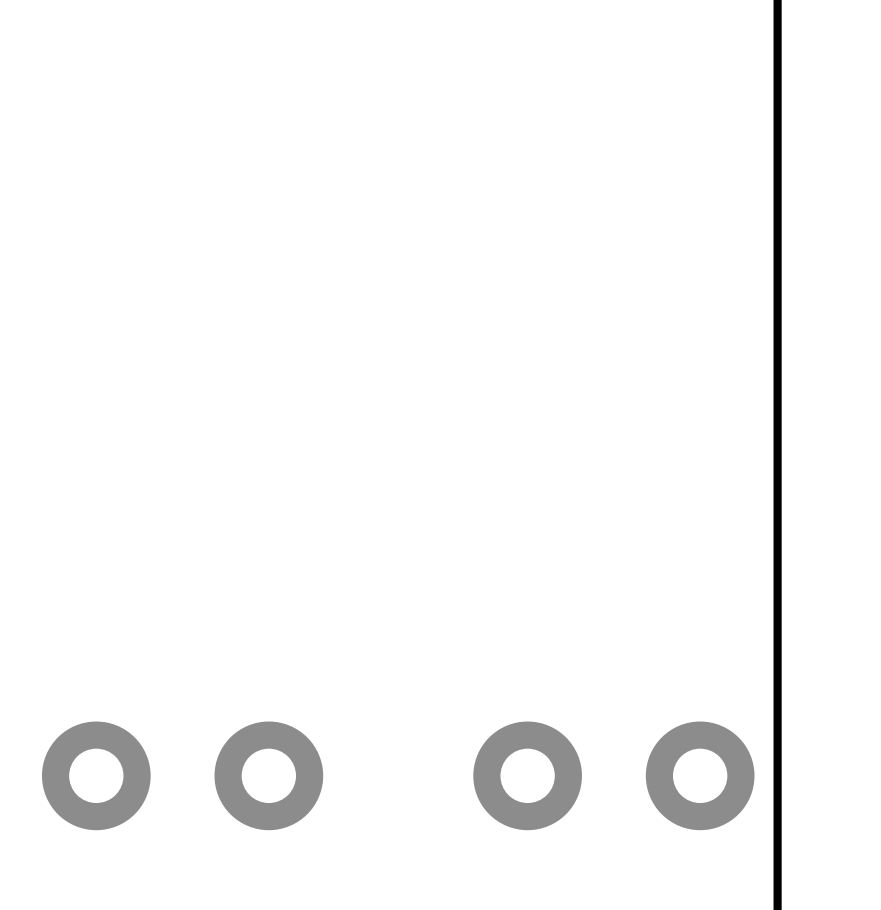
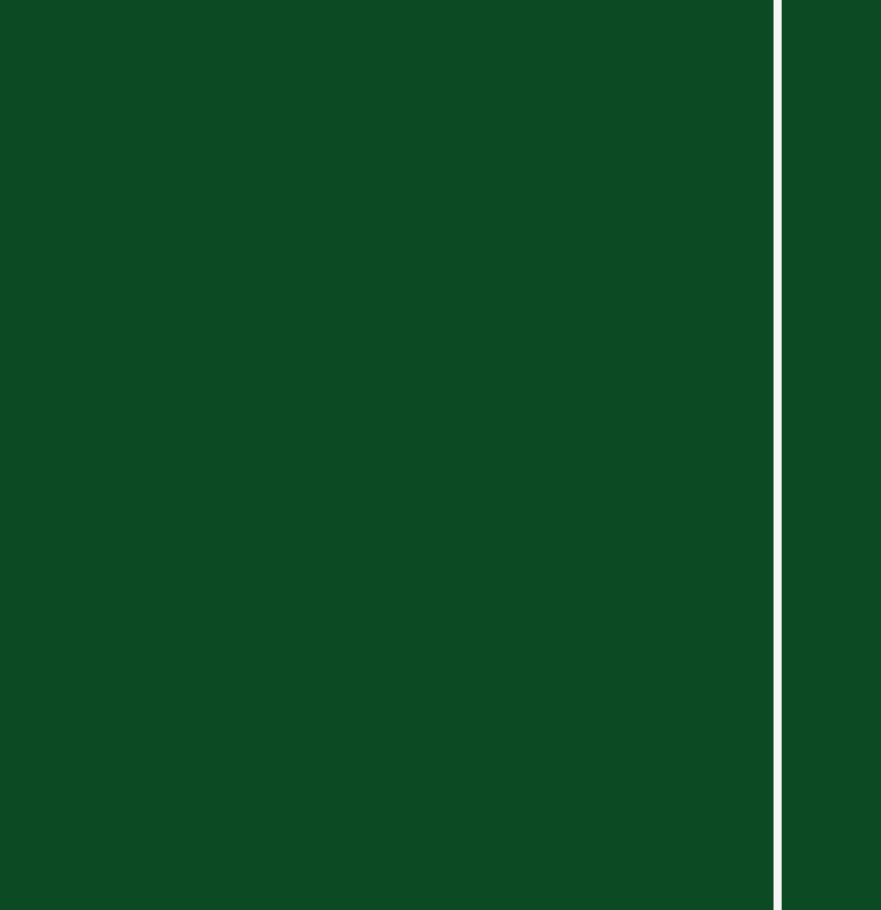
part: (182, 775) -> none
part: (613, 775) -> none

